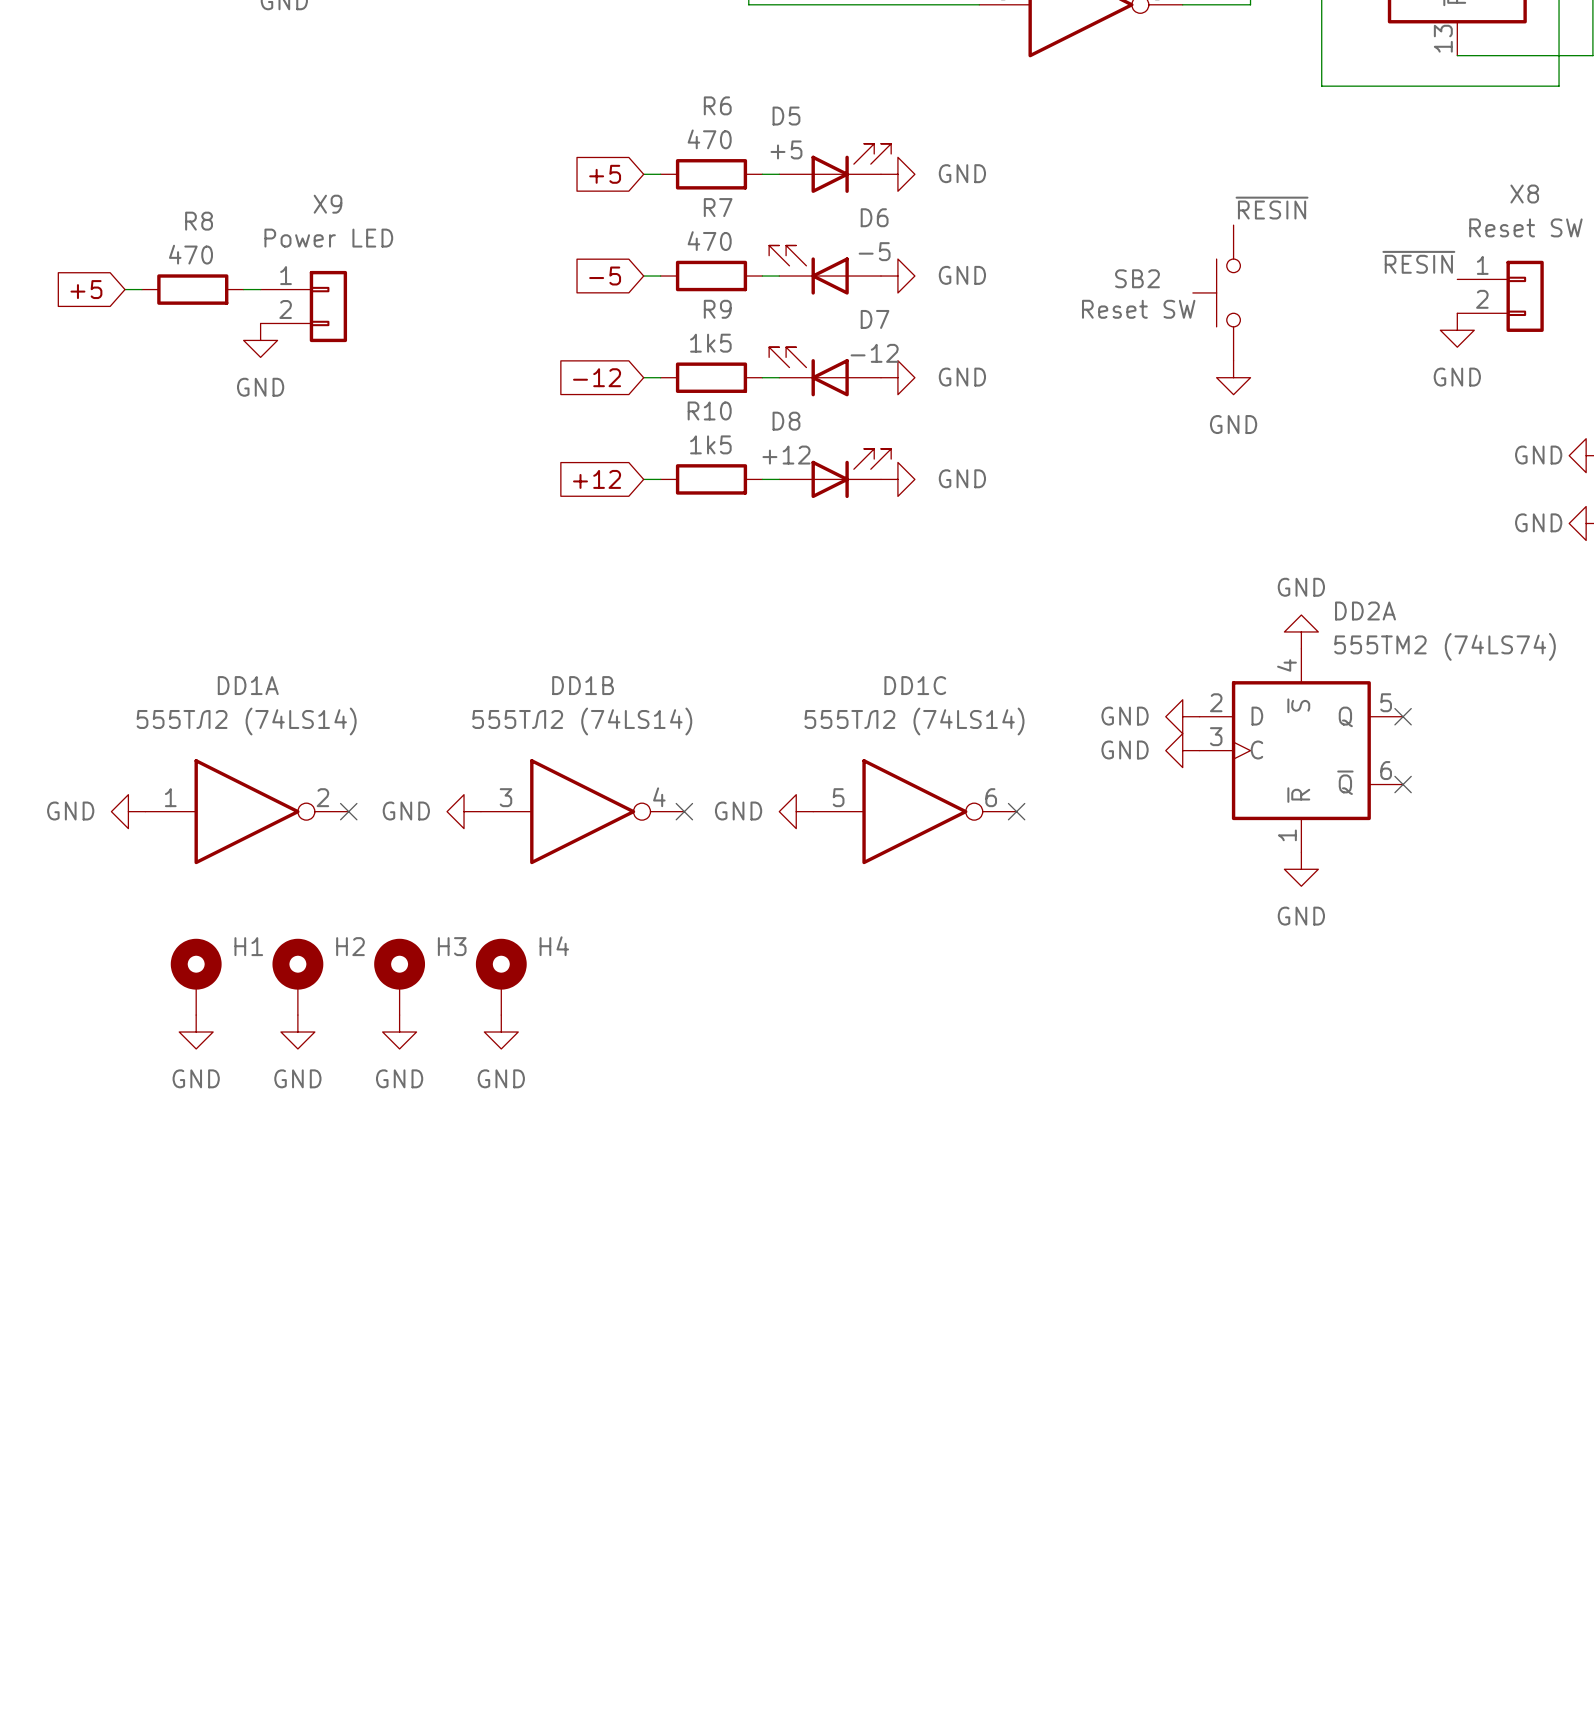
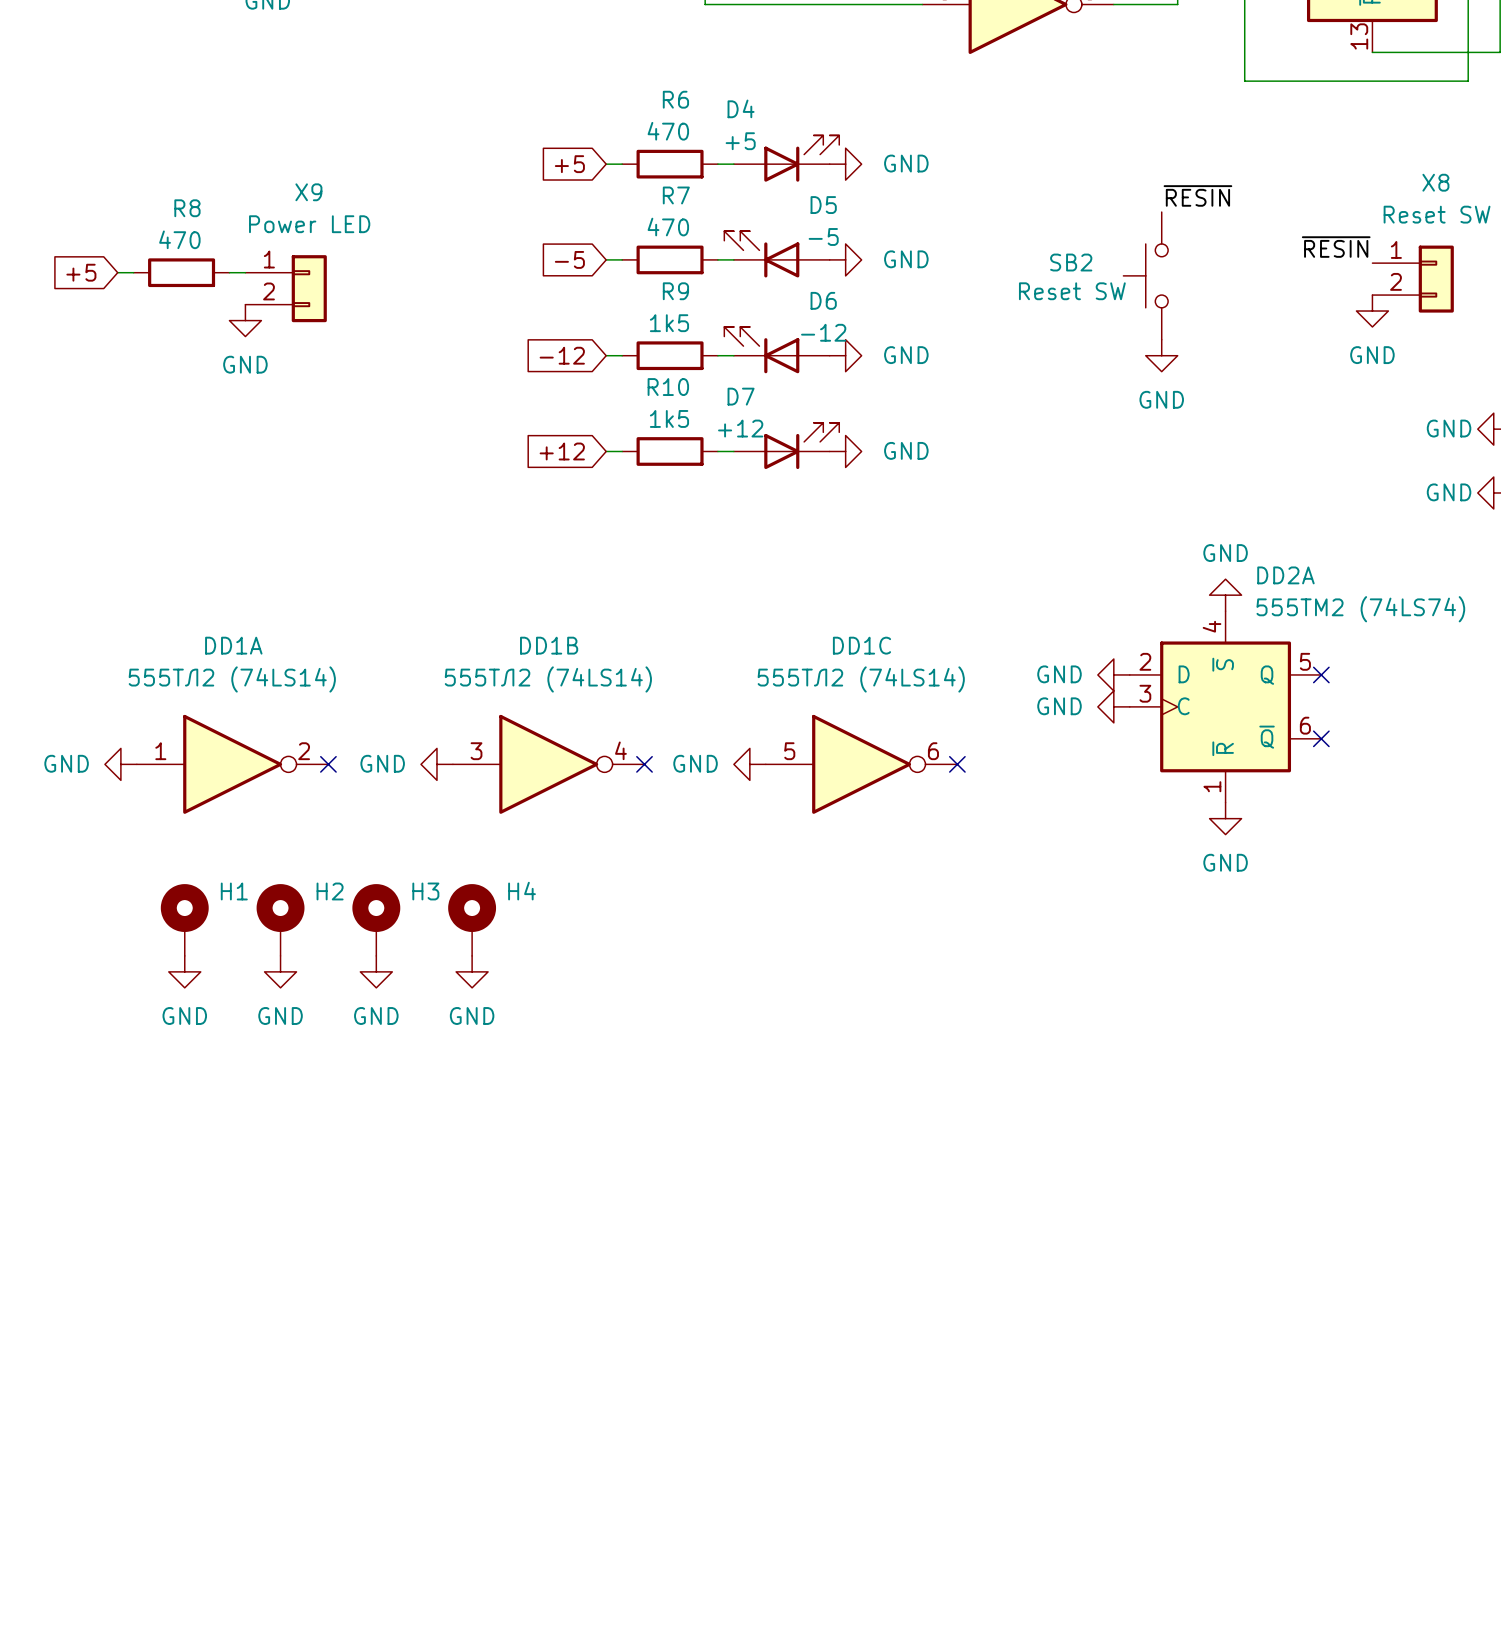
D5 name: D5 (786, 116) -> D4 (741, 108)
D6 name: D6 (874, 217) -> D5 (823, 205)
D7 name: D7 (875, 319) -> D6 (823, 300)
D8 name: D8 (786, 421) -> D7 (741, 396)

